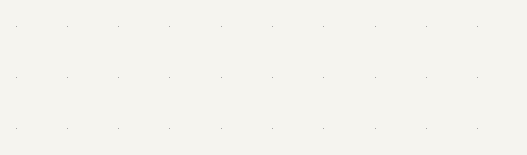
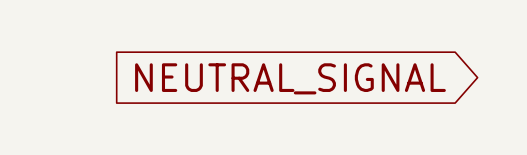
global label: none -> NEUTRAL_SIGNAL (290, 78)

